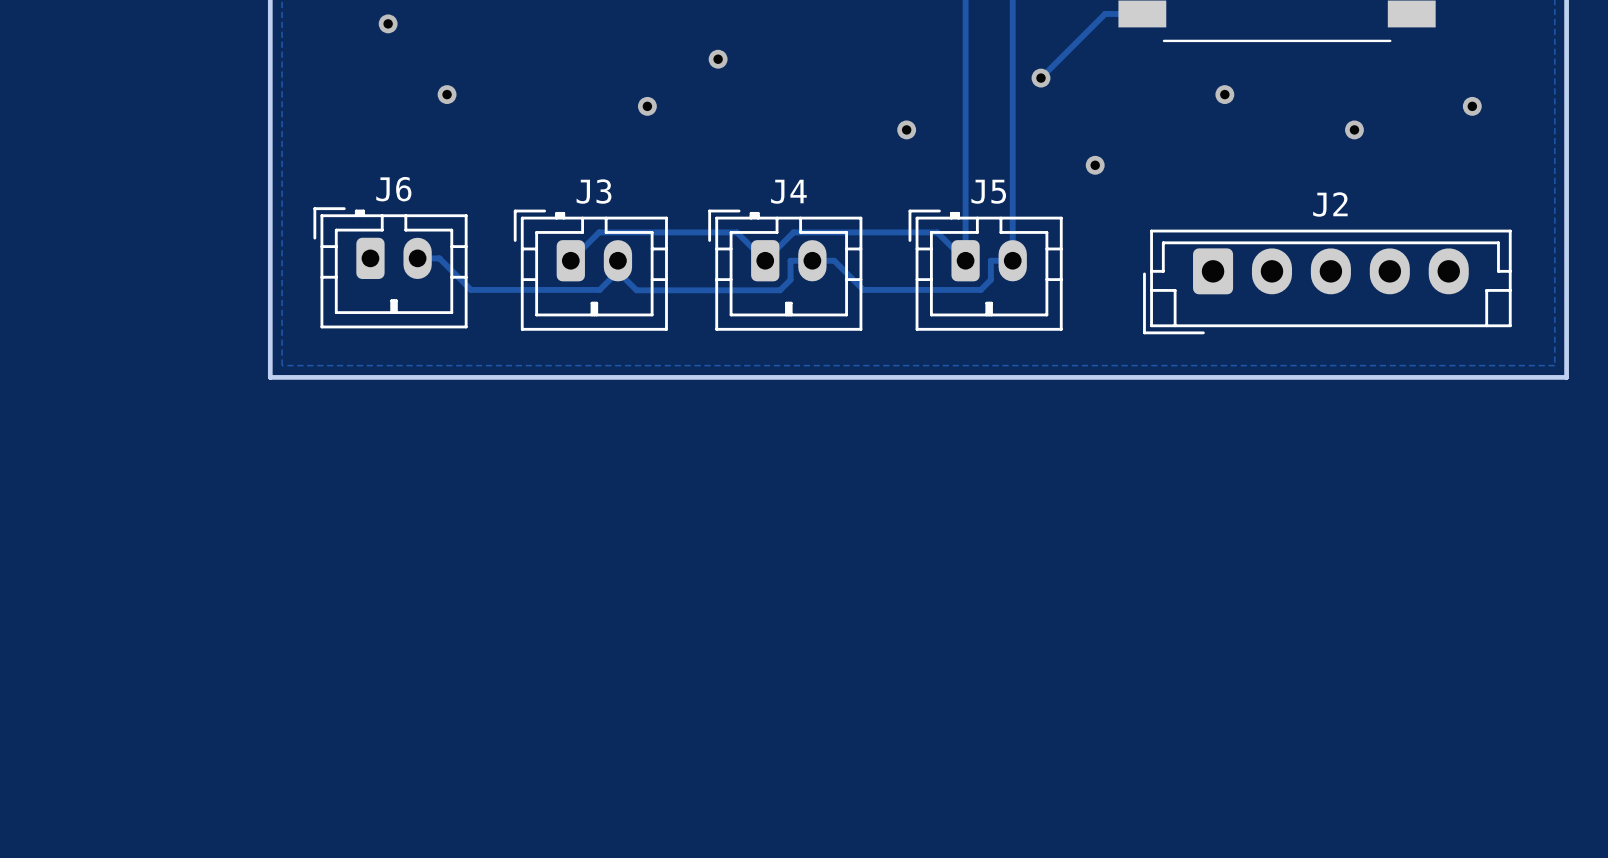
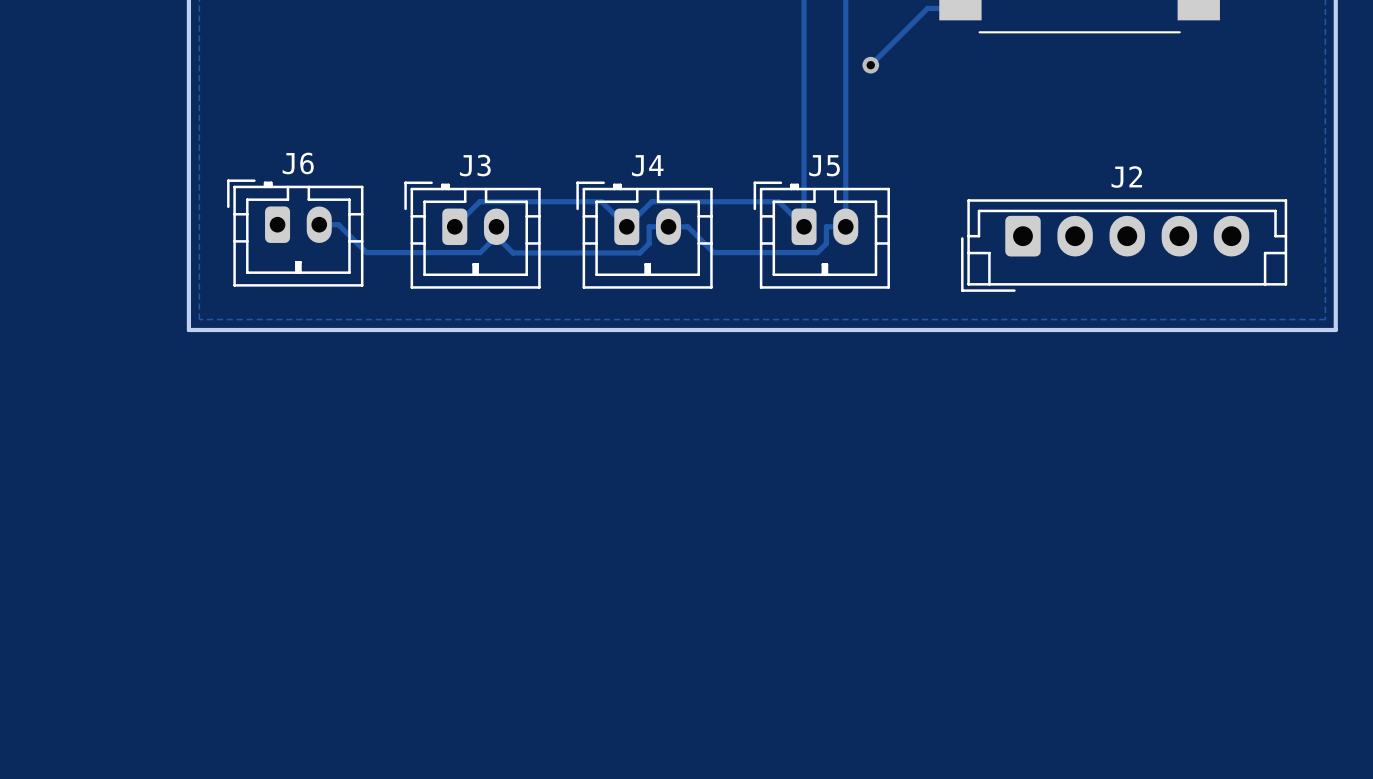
via: (388, 23) -> none
via: (718, 59) -> none
via: (447, 94) -> none
via: (1224, 94) -> none
via: (647, 106) -> none
via: (1472, 106) -> none
via: (906, 129) -> none
via: (1354, 129) -> none
via: (1095, 165) -> none

